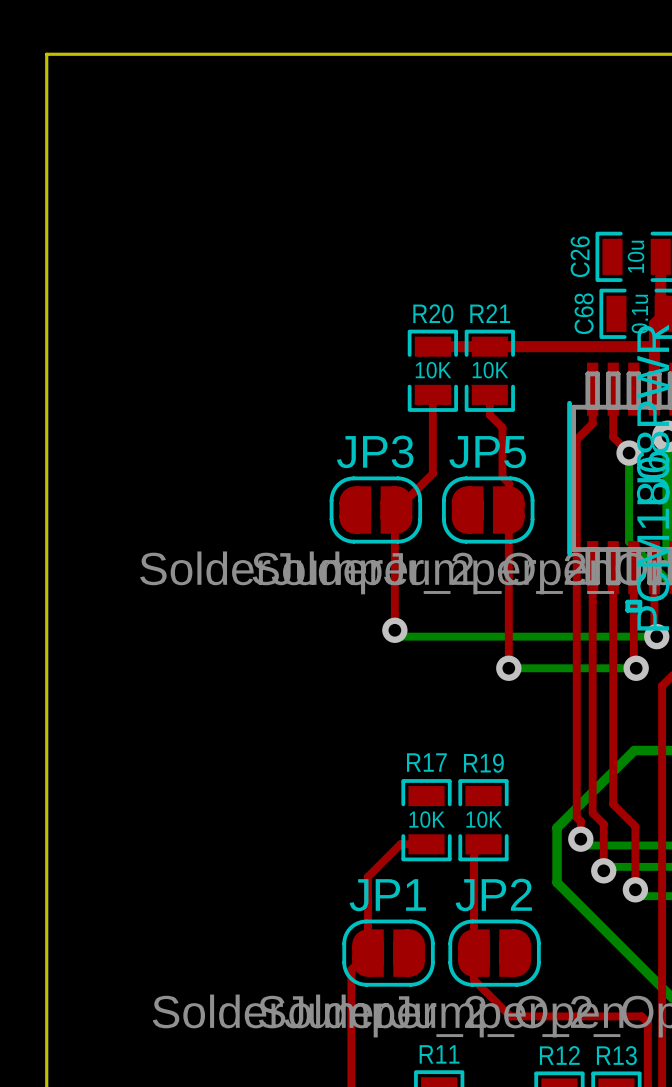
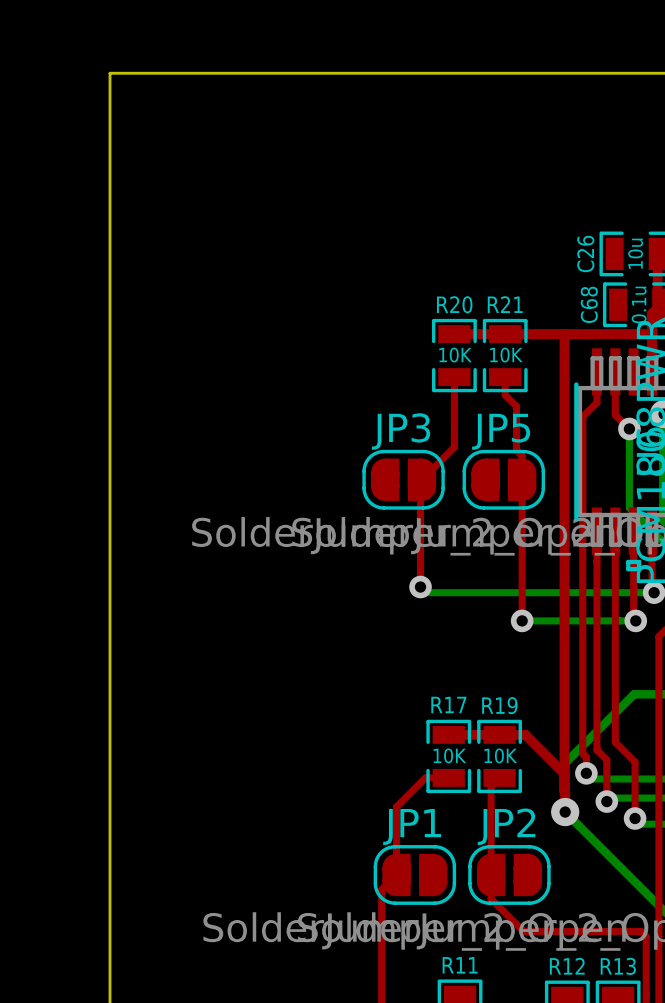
top track: none -> (563, 334) (565, 812)
top track: none -> (448, 734) (525, 734) (564, 773)
via: none -> (565, 812)

